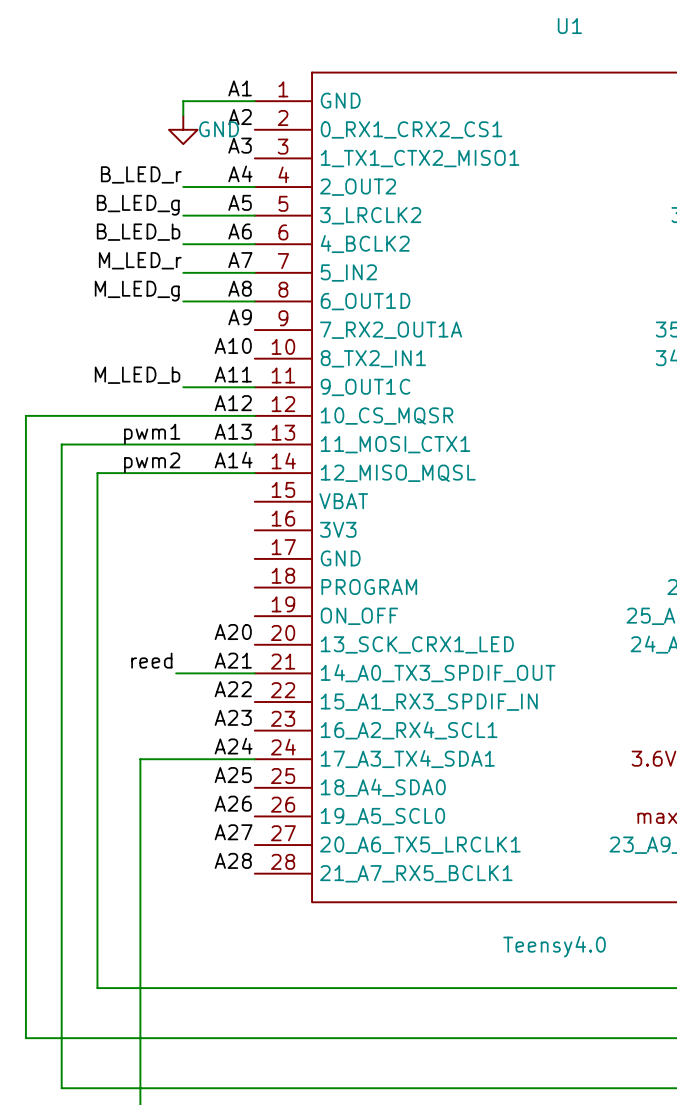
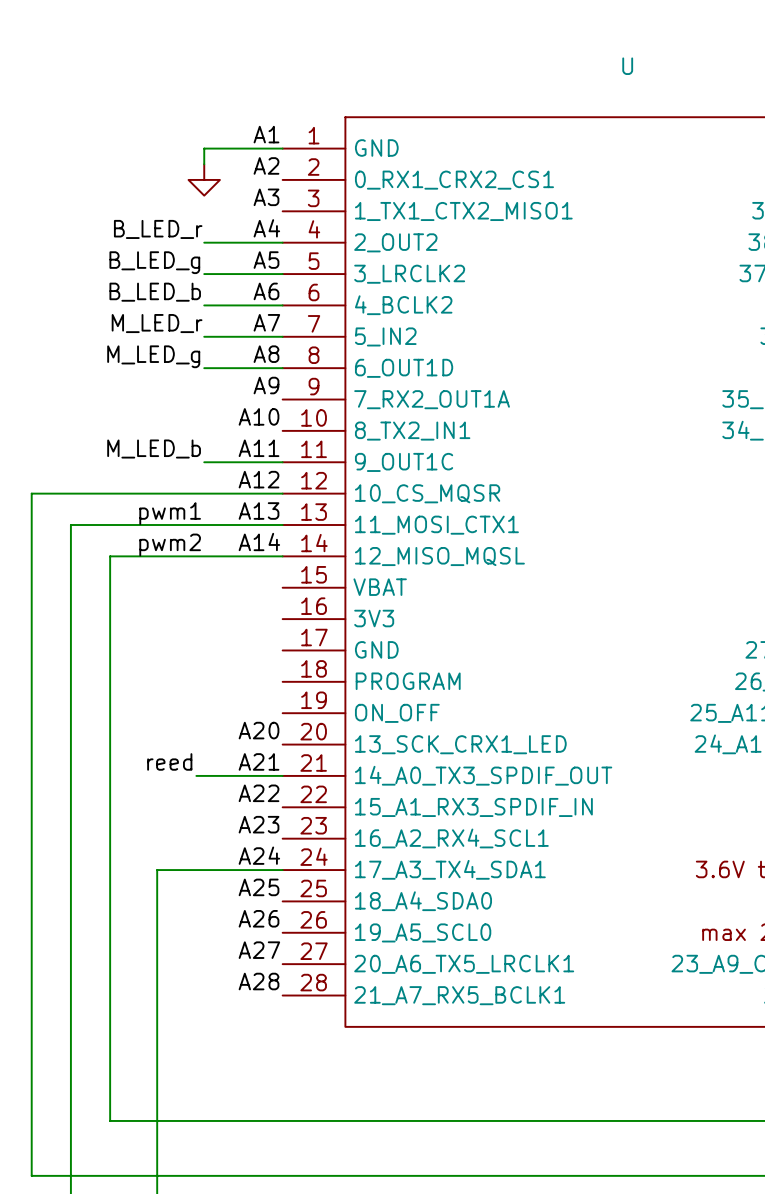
U1 name: U1 (569, 26) -> U (627, 66)
power symbol text: GND (219, 129) -> none
U1 value: Teensy4.0 (554, 946) -> none

